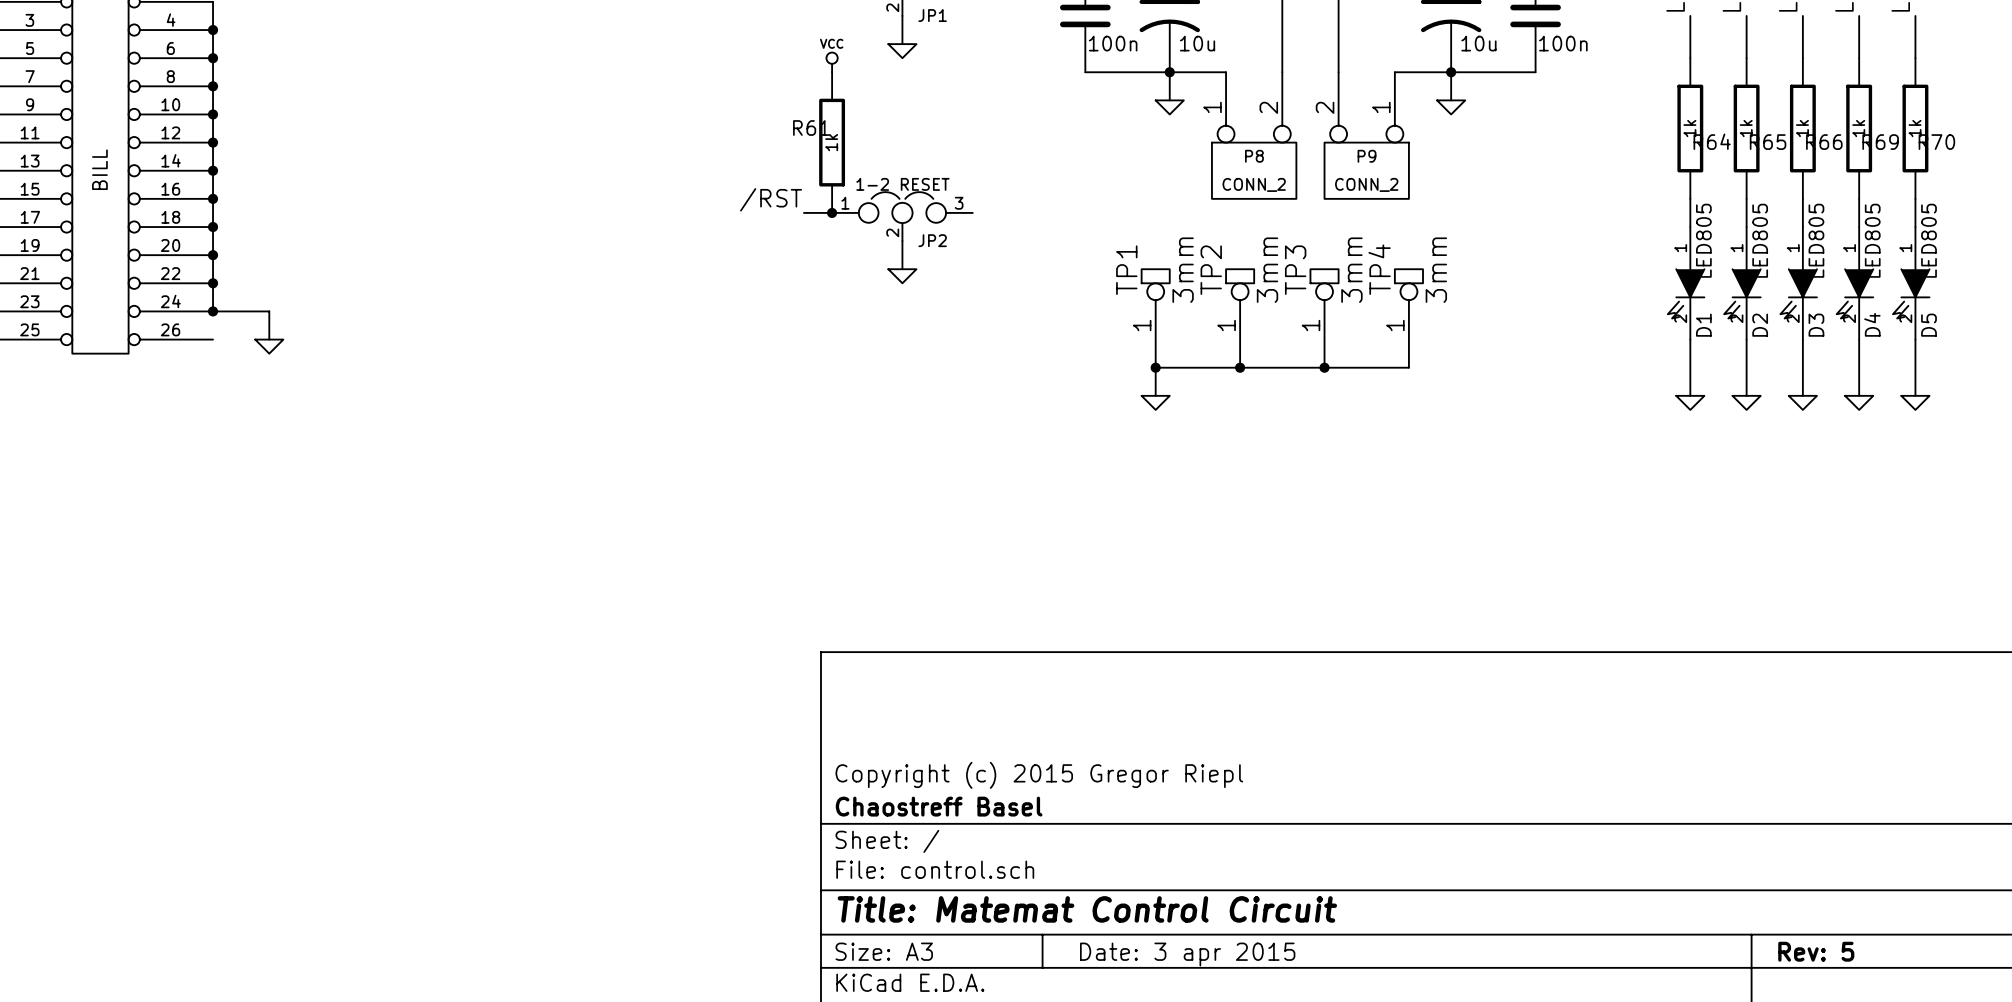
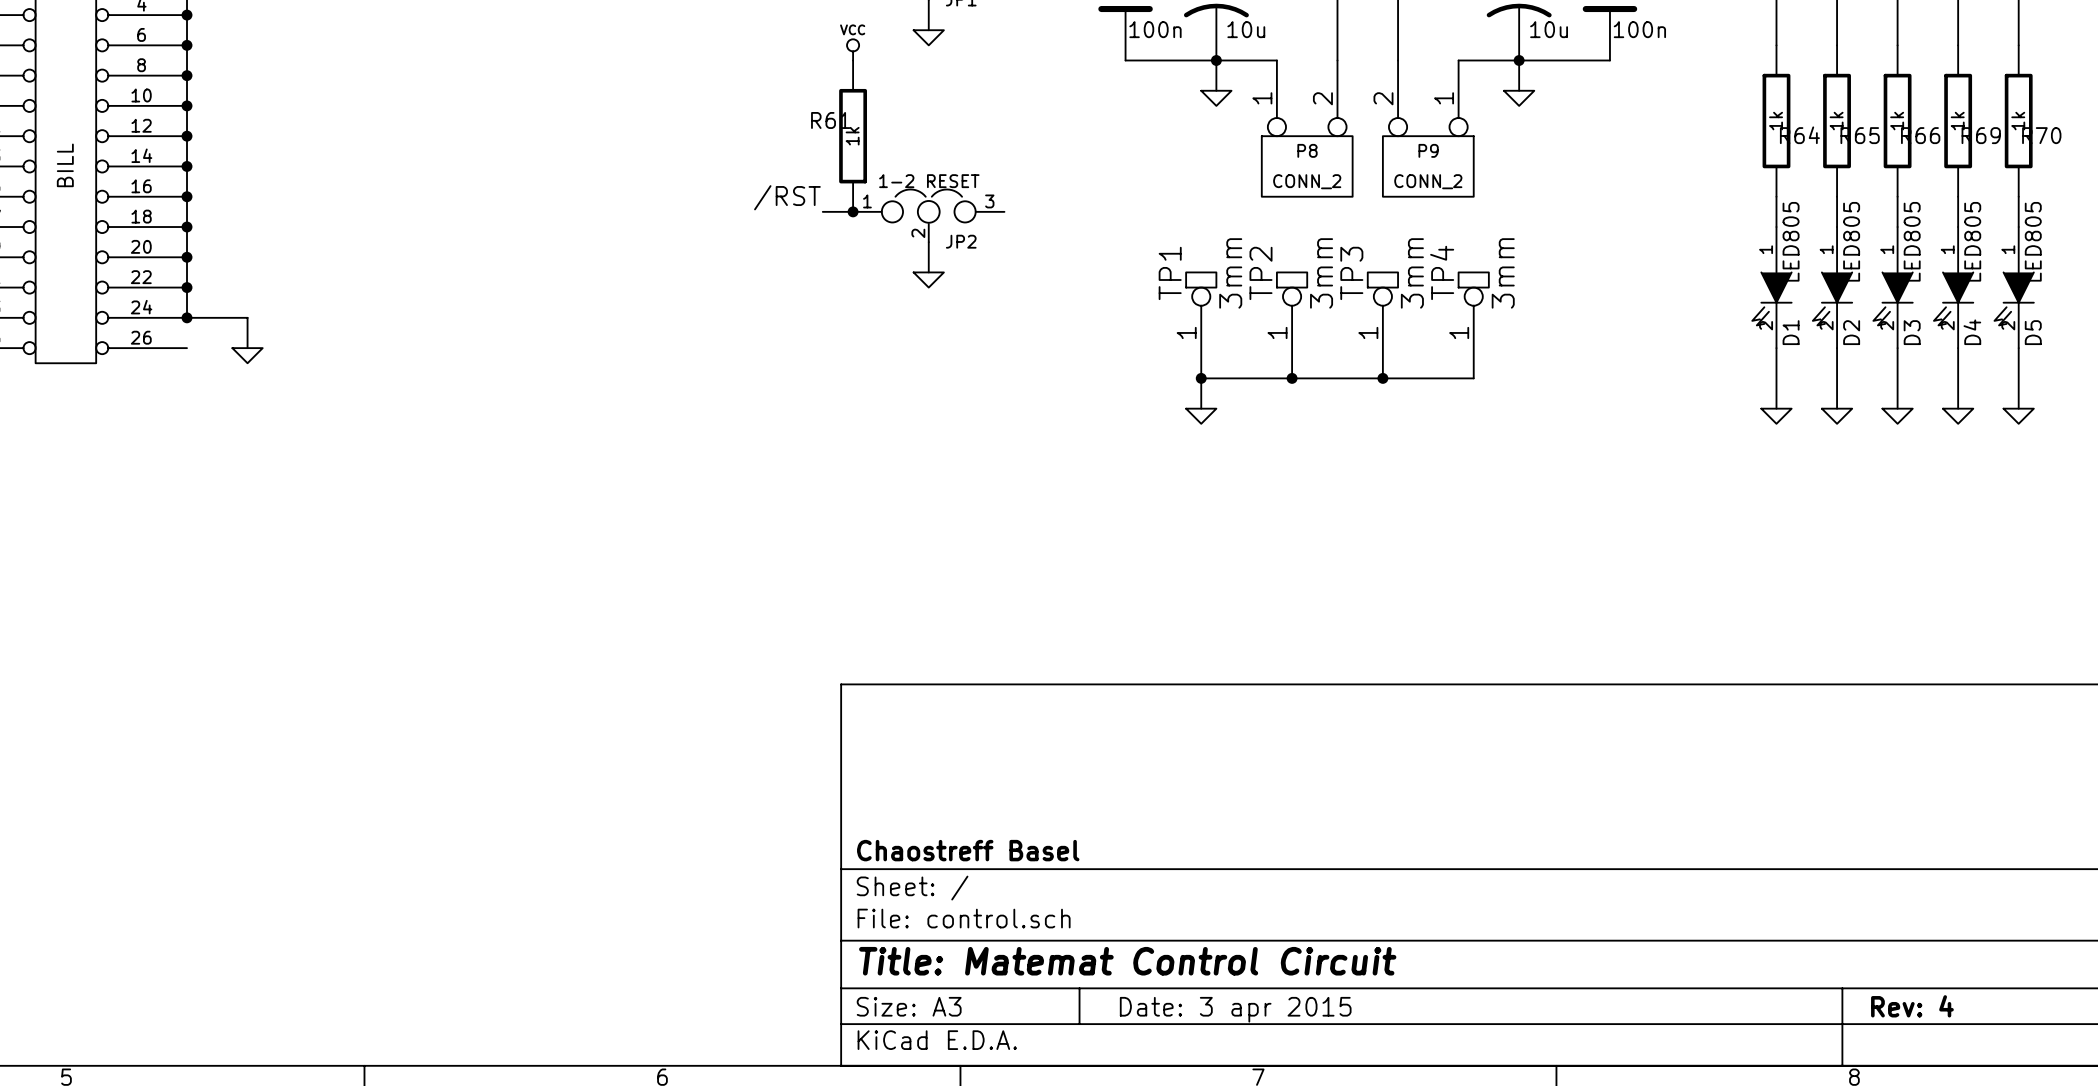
title block: Copyright (c) 2015 Gregor Riepl (1039, 775) -> none
title block: Rev: 5 (1816, 951) -> Rev: 4 (1912, 1006)

